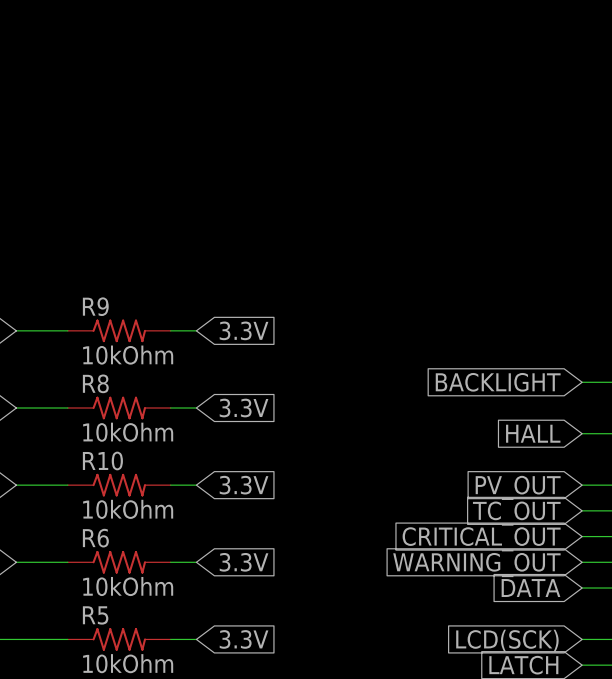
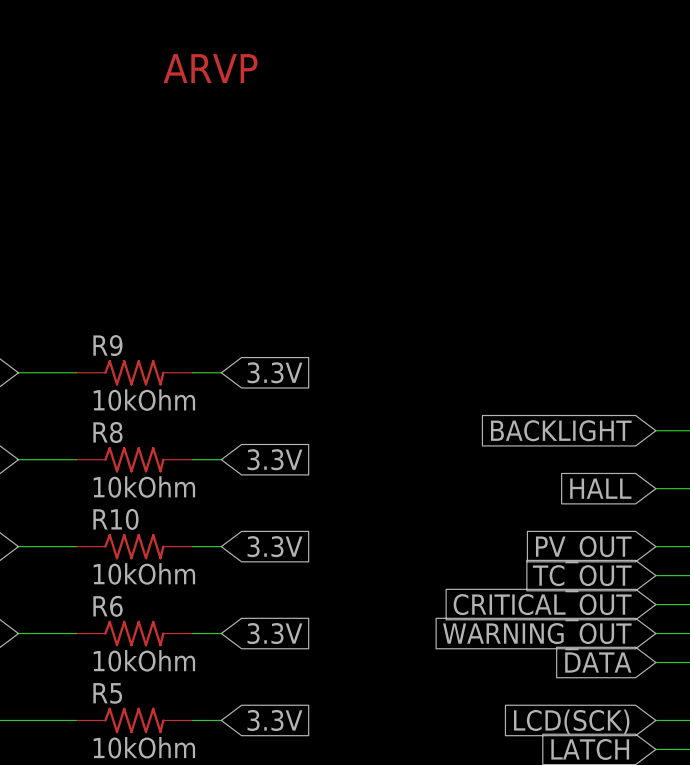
part: none -> (210, 68)

